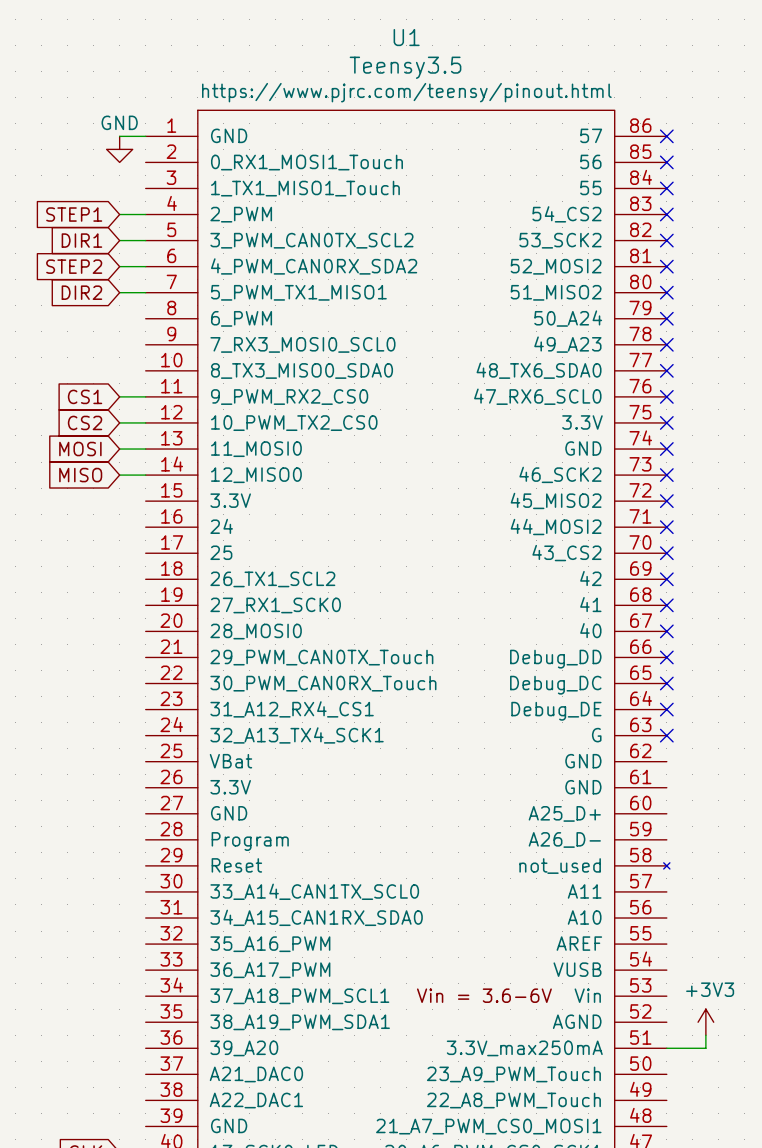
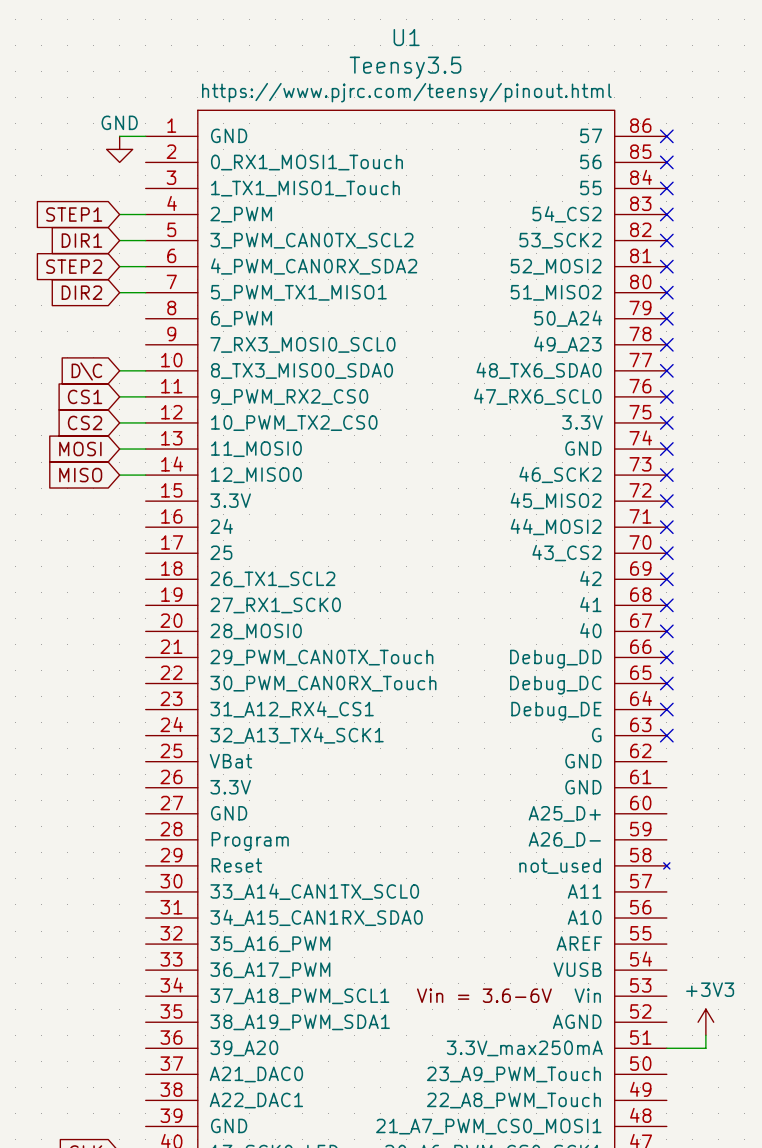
wire: none -> (119, 370) (145, 370)
global label: none -> D\C (86, 371)

